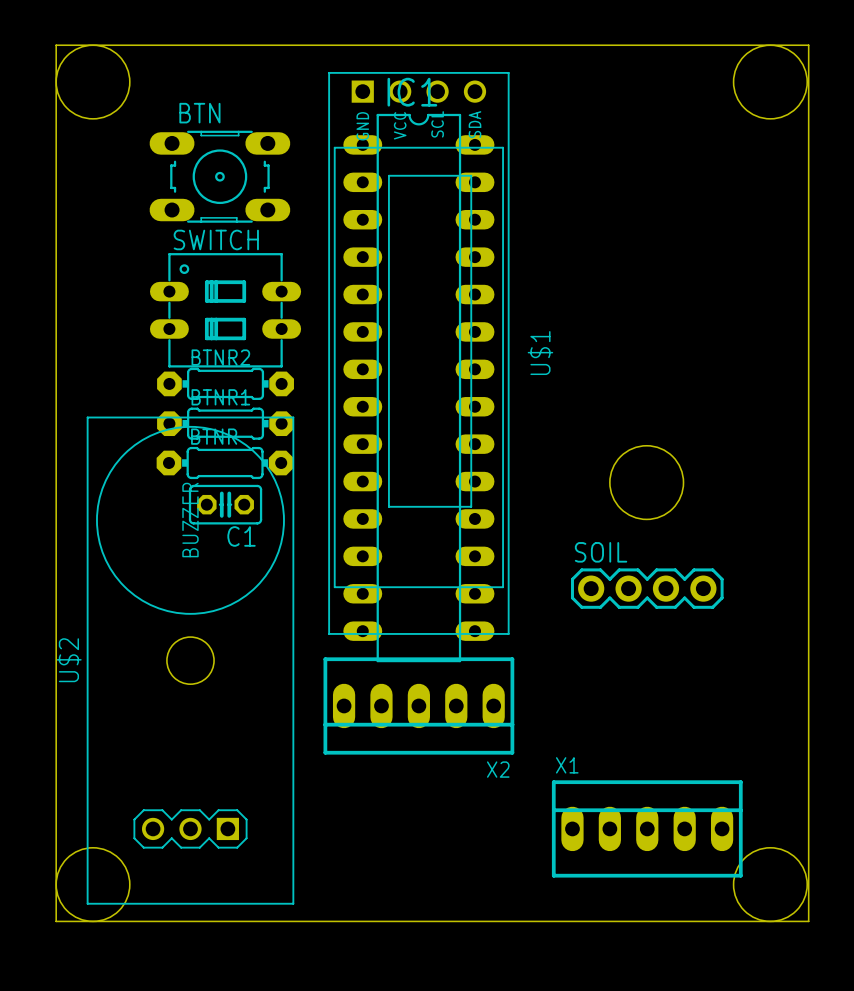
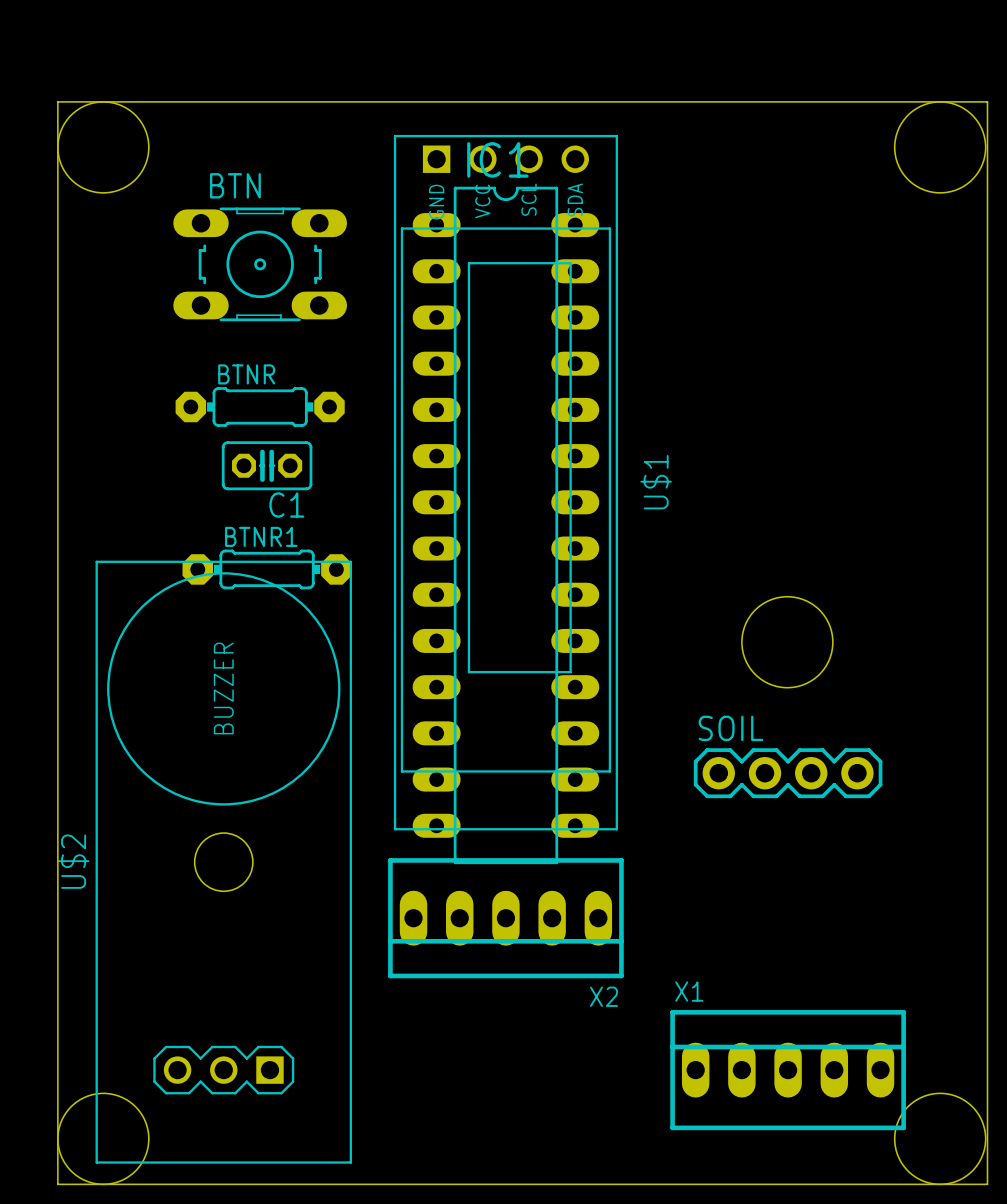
SWITCH: (225, 310) -> none
BTNR2: (225, 383) -> none
BTNR position: (225, 463) -> (260, 406)
C1 position: (225, 504) -> (267, 465)

